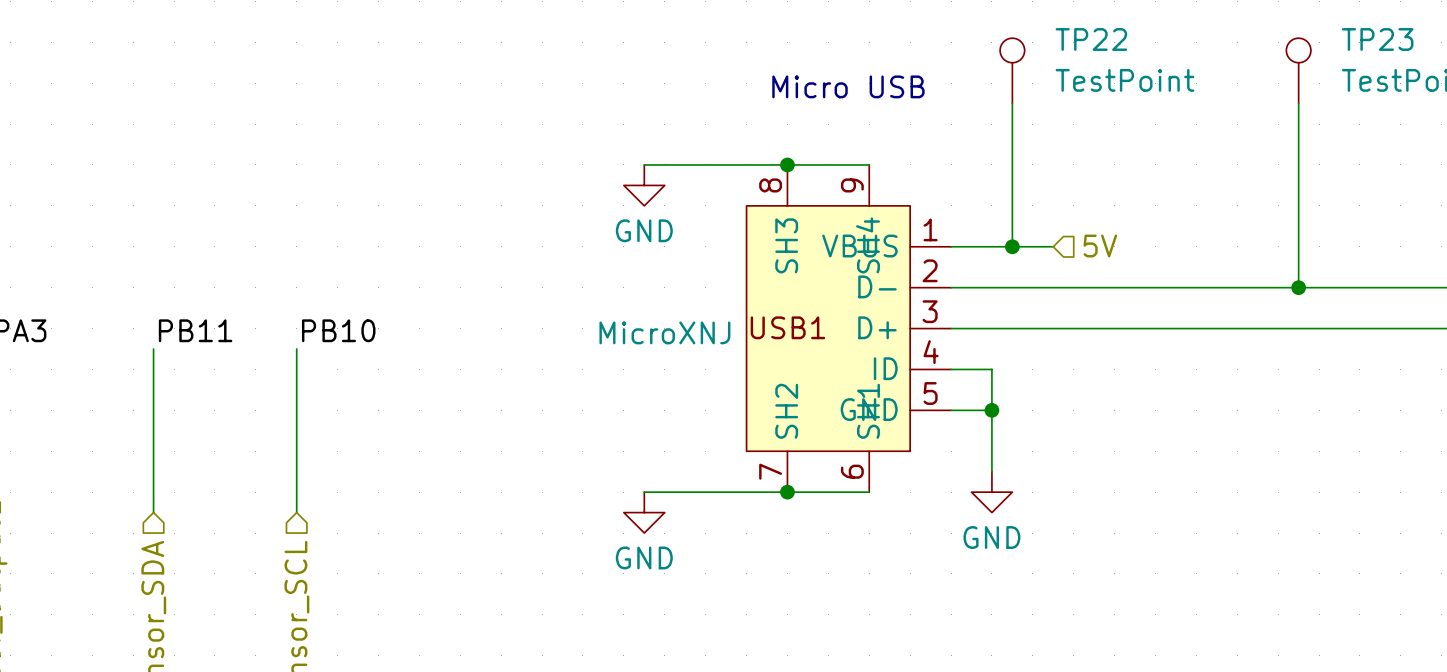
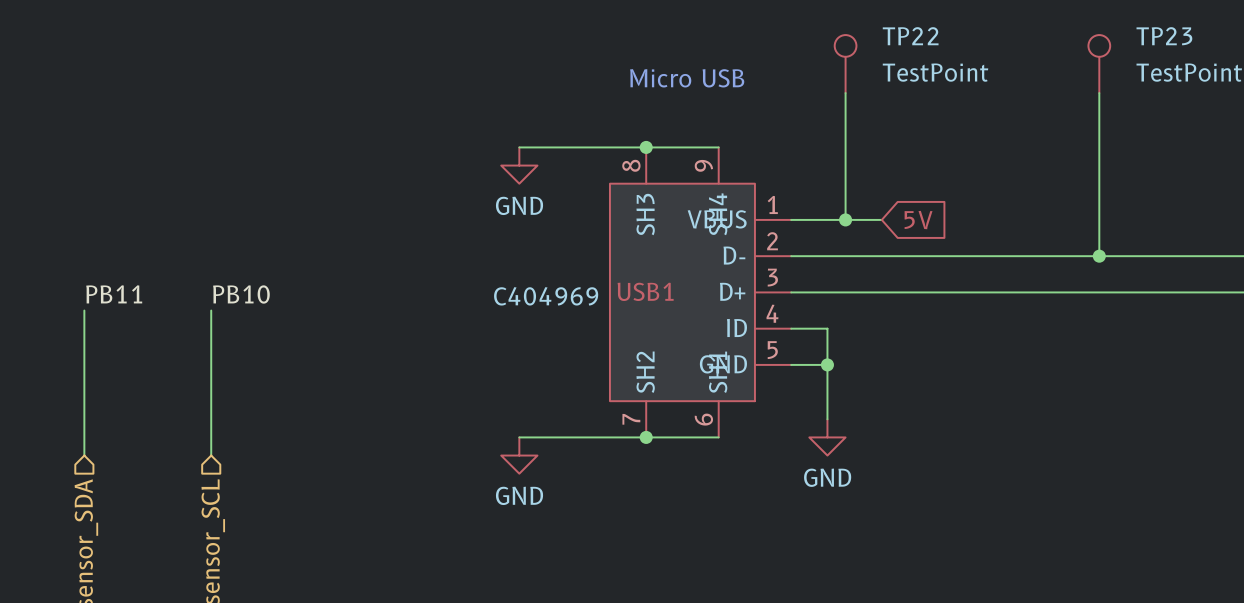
global label: none -> 5V (918, 220)
hierarchical label: 5V (1100, 246) -> none
MicroXNJ name: MicroXNJ (664, 332) -> C404969 (546, 296)

